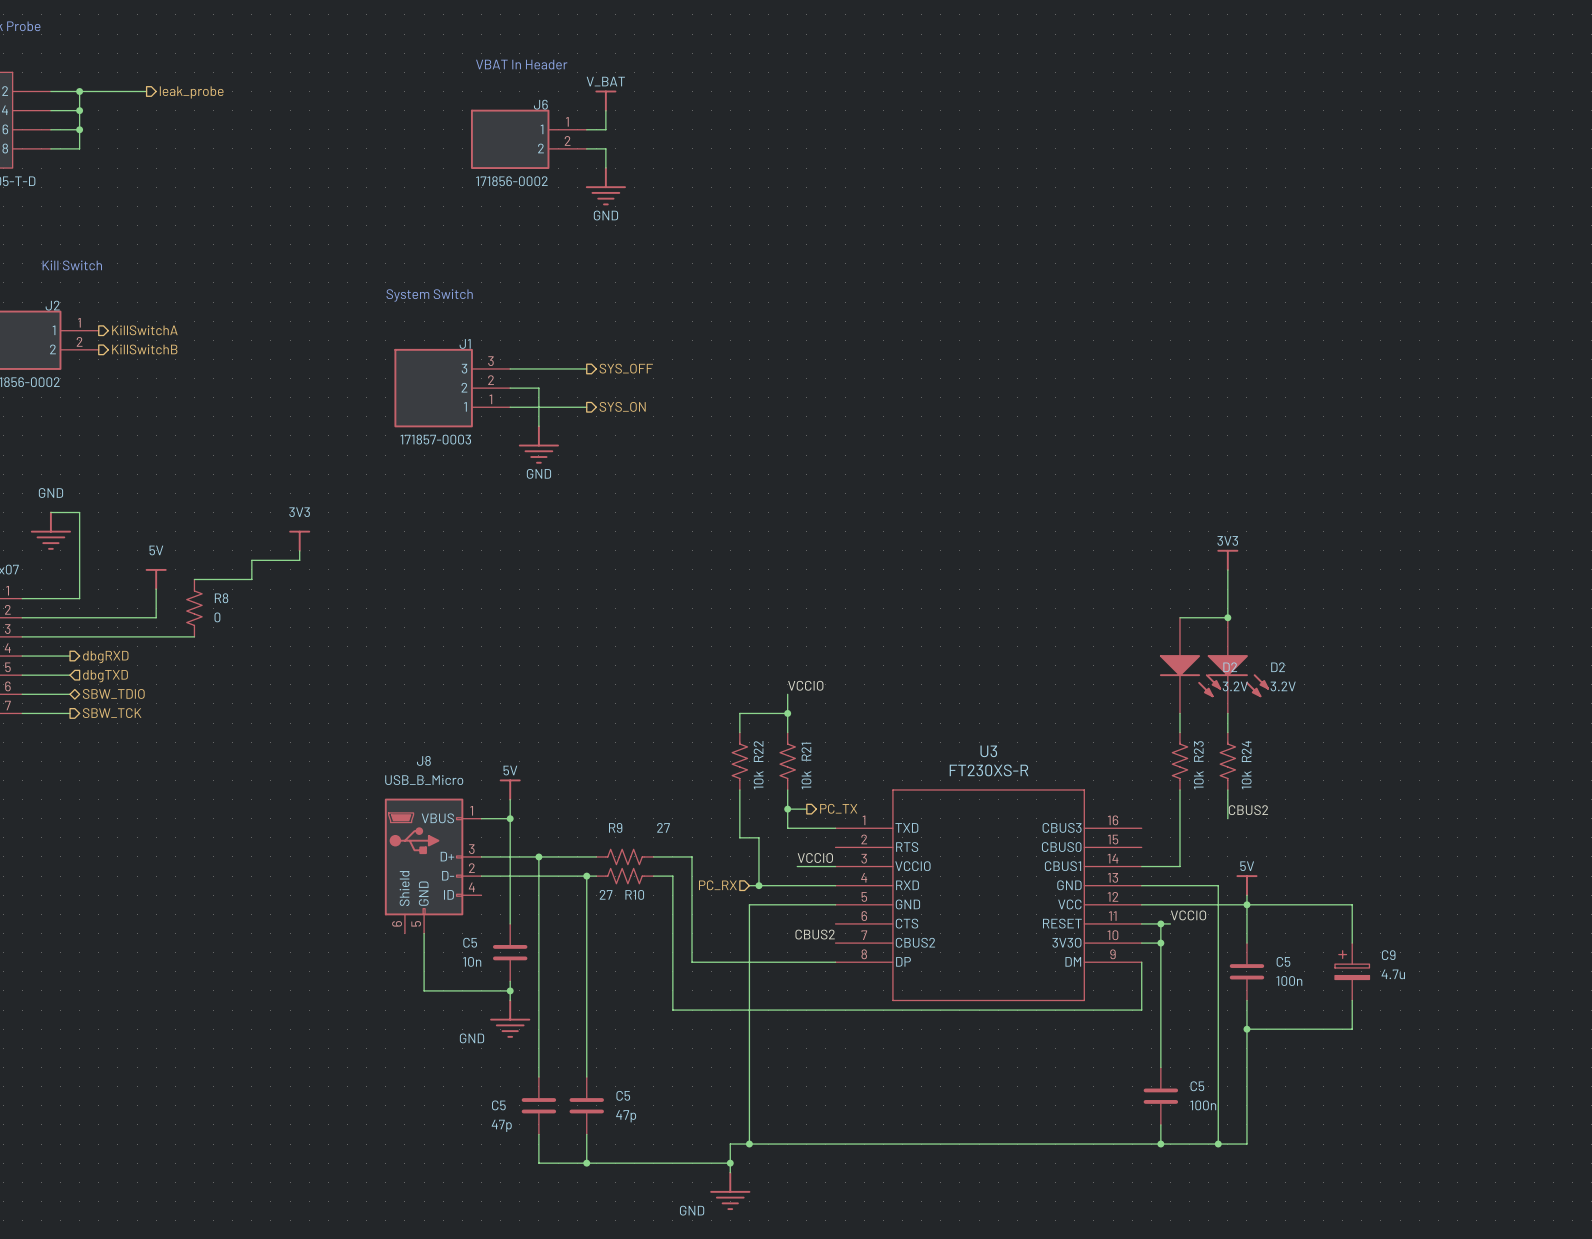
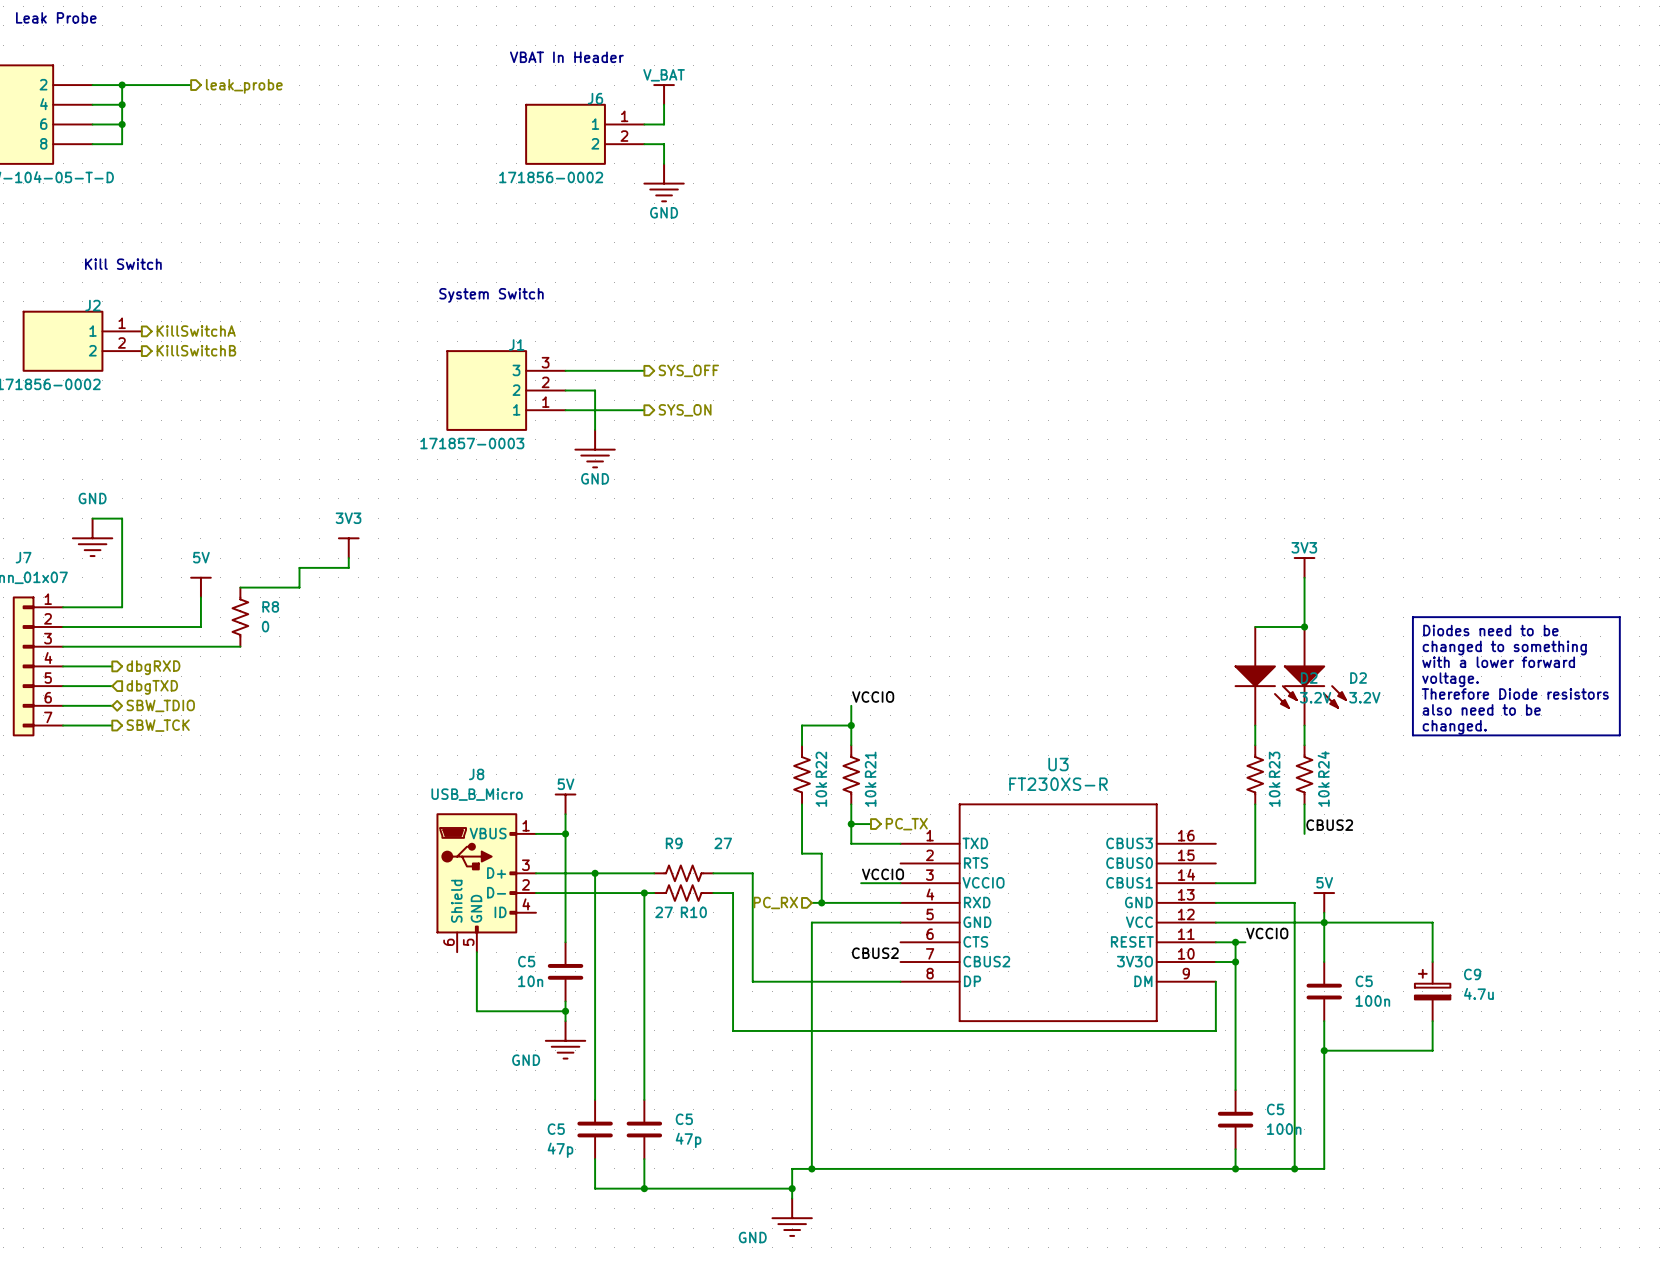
line: none -> (1412, 617) (1619, 617) (1619, 735) (1412, 735) (1412, 617)
text: none -> Diodes need to be (1490, 630)
text: none -> changed to something (1504, 648)
text: none -> with a lower forward (1498, 662)
text: none -> voltage. (1450, 679)
text: none -> Therefore Diode resistors (1515, 693)
text: none -> also need to be (1481, 709)
text: none -> changed. (1454, 727)

